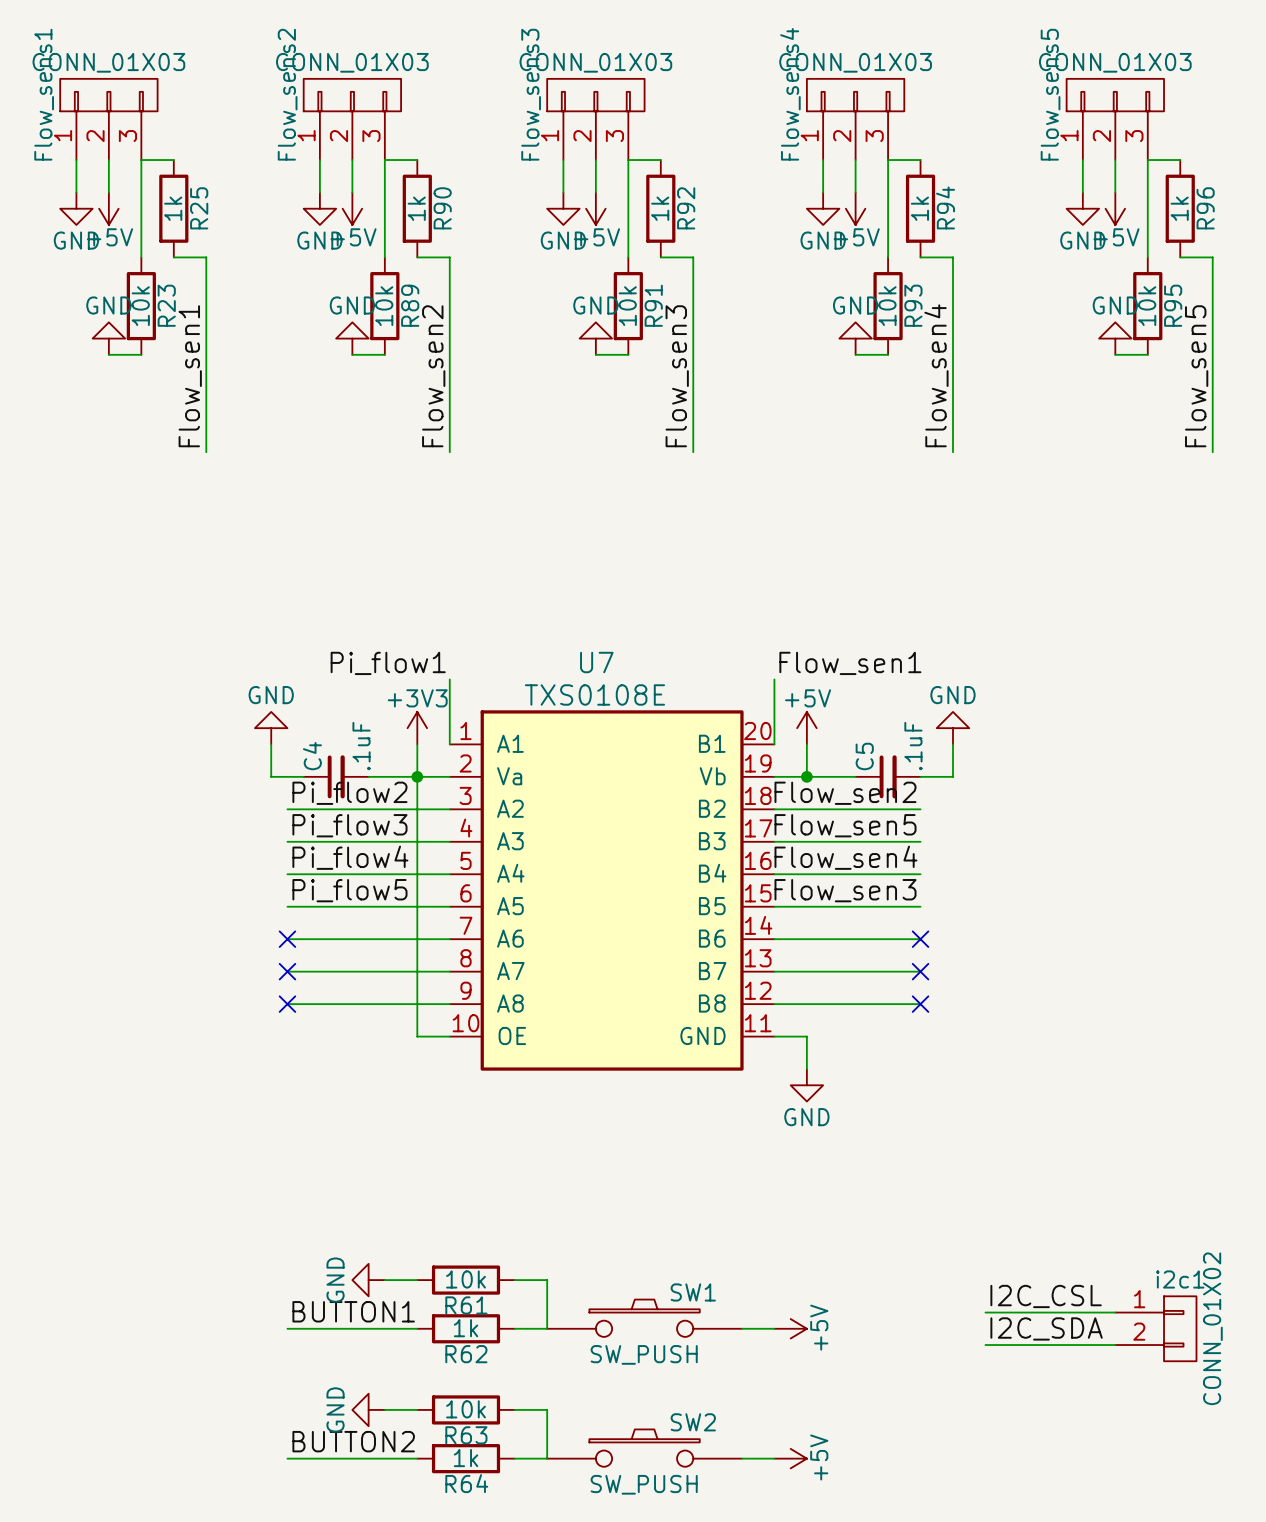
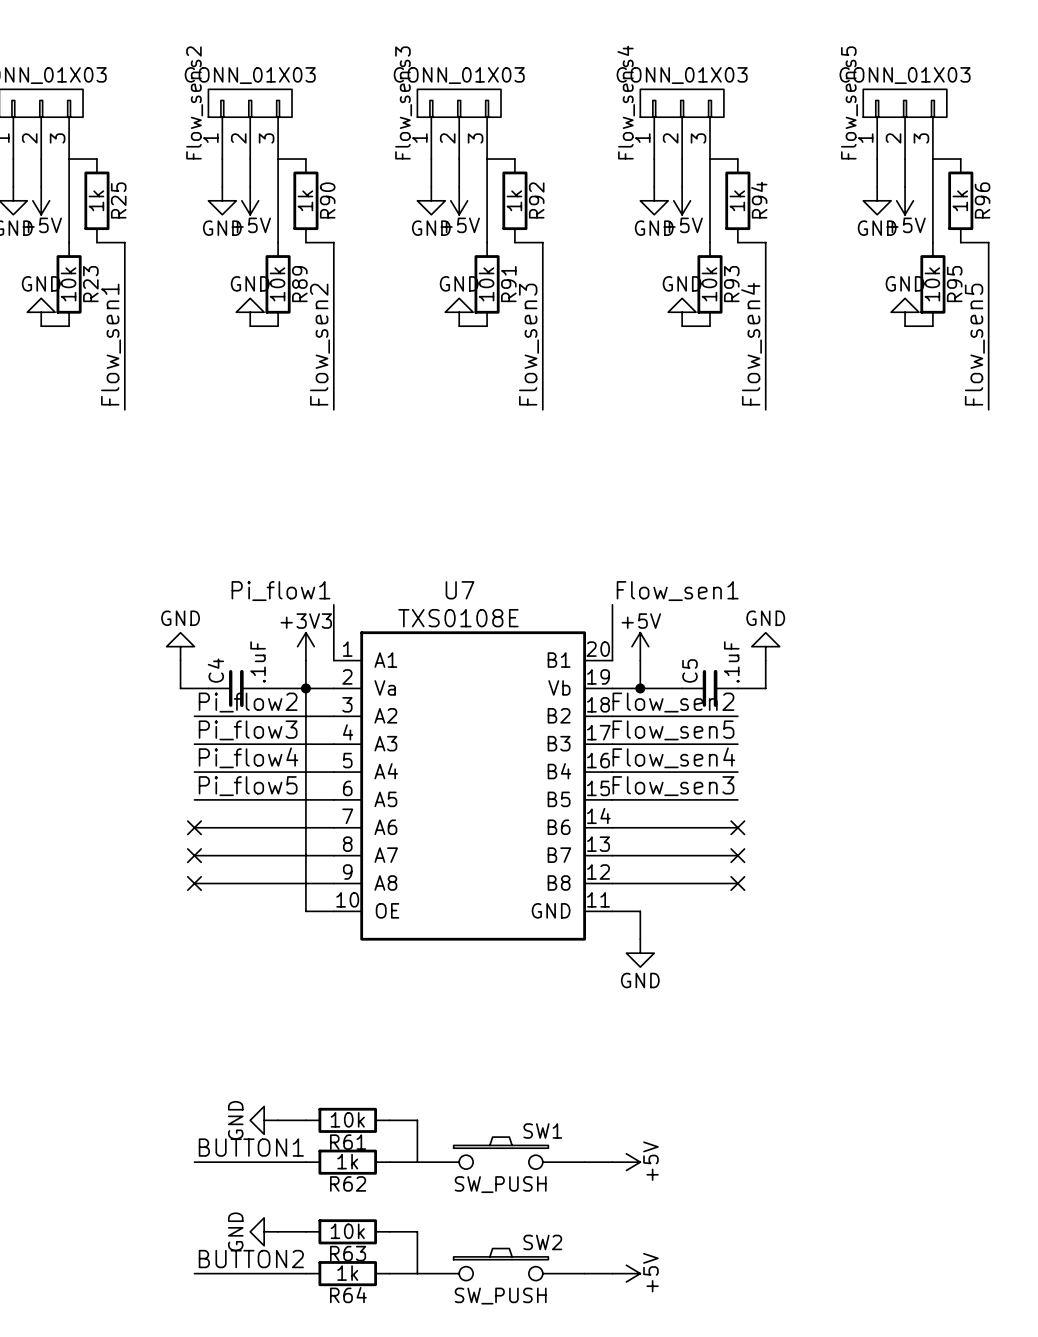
label: I2C_CSL (1046, 1296) -> none
wire: (985, 1312) (1115, 1312) -> none
label: I2C_SDA (1046, 1328) -> none
i2c1: CONN_01X02 (1155, 1328) -> none
wire: (985, 1345) (1115, 1345) -> none

